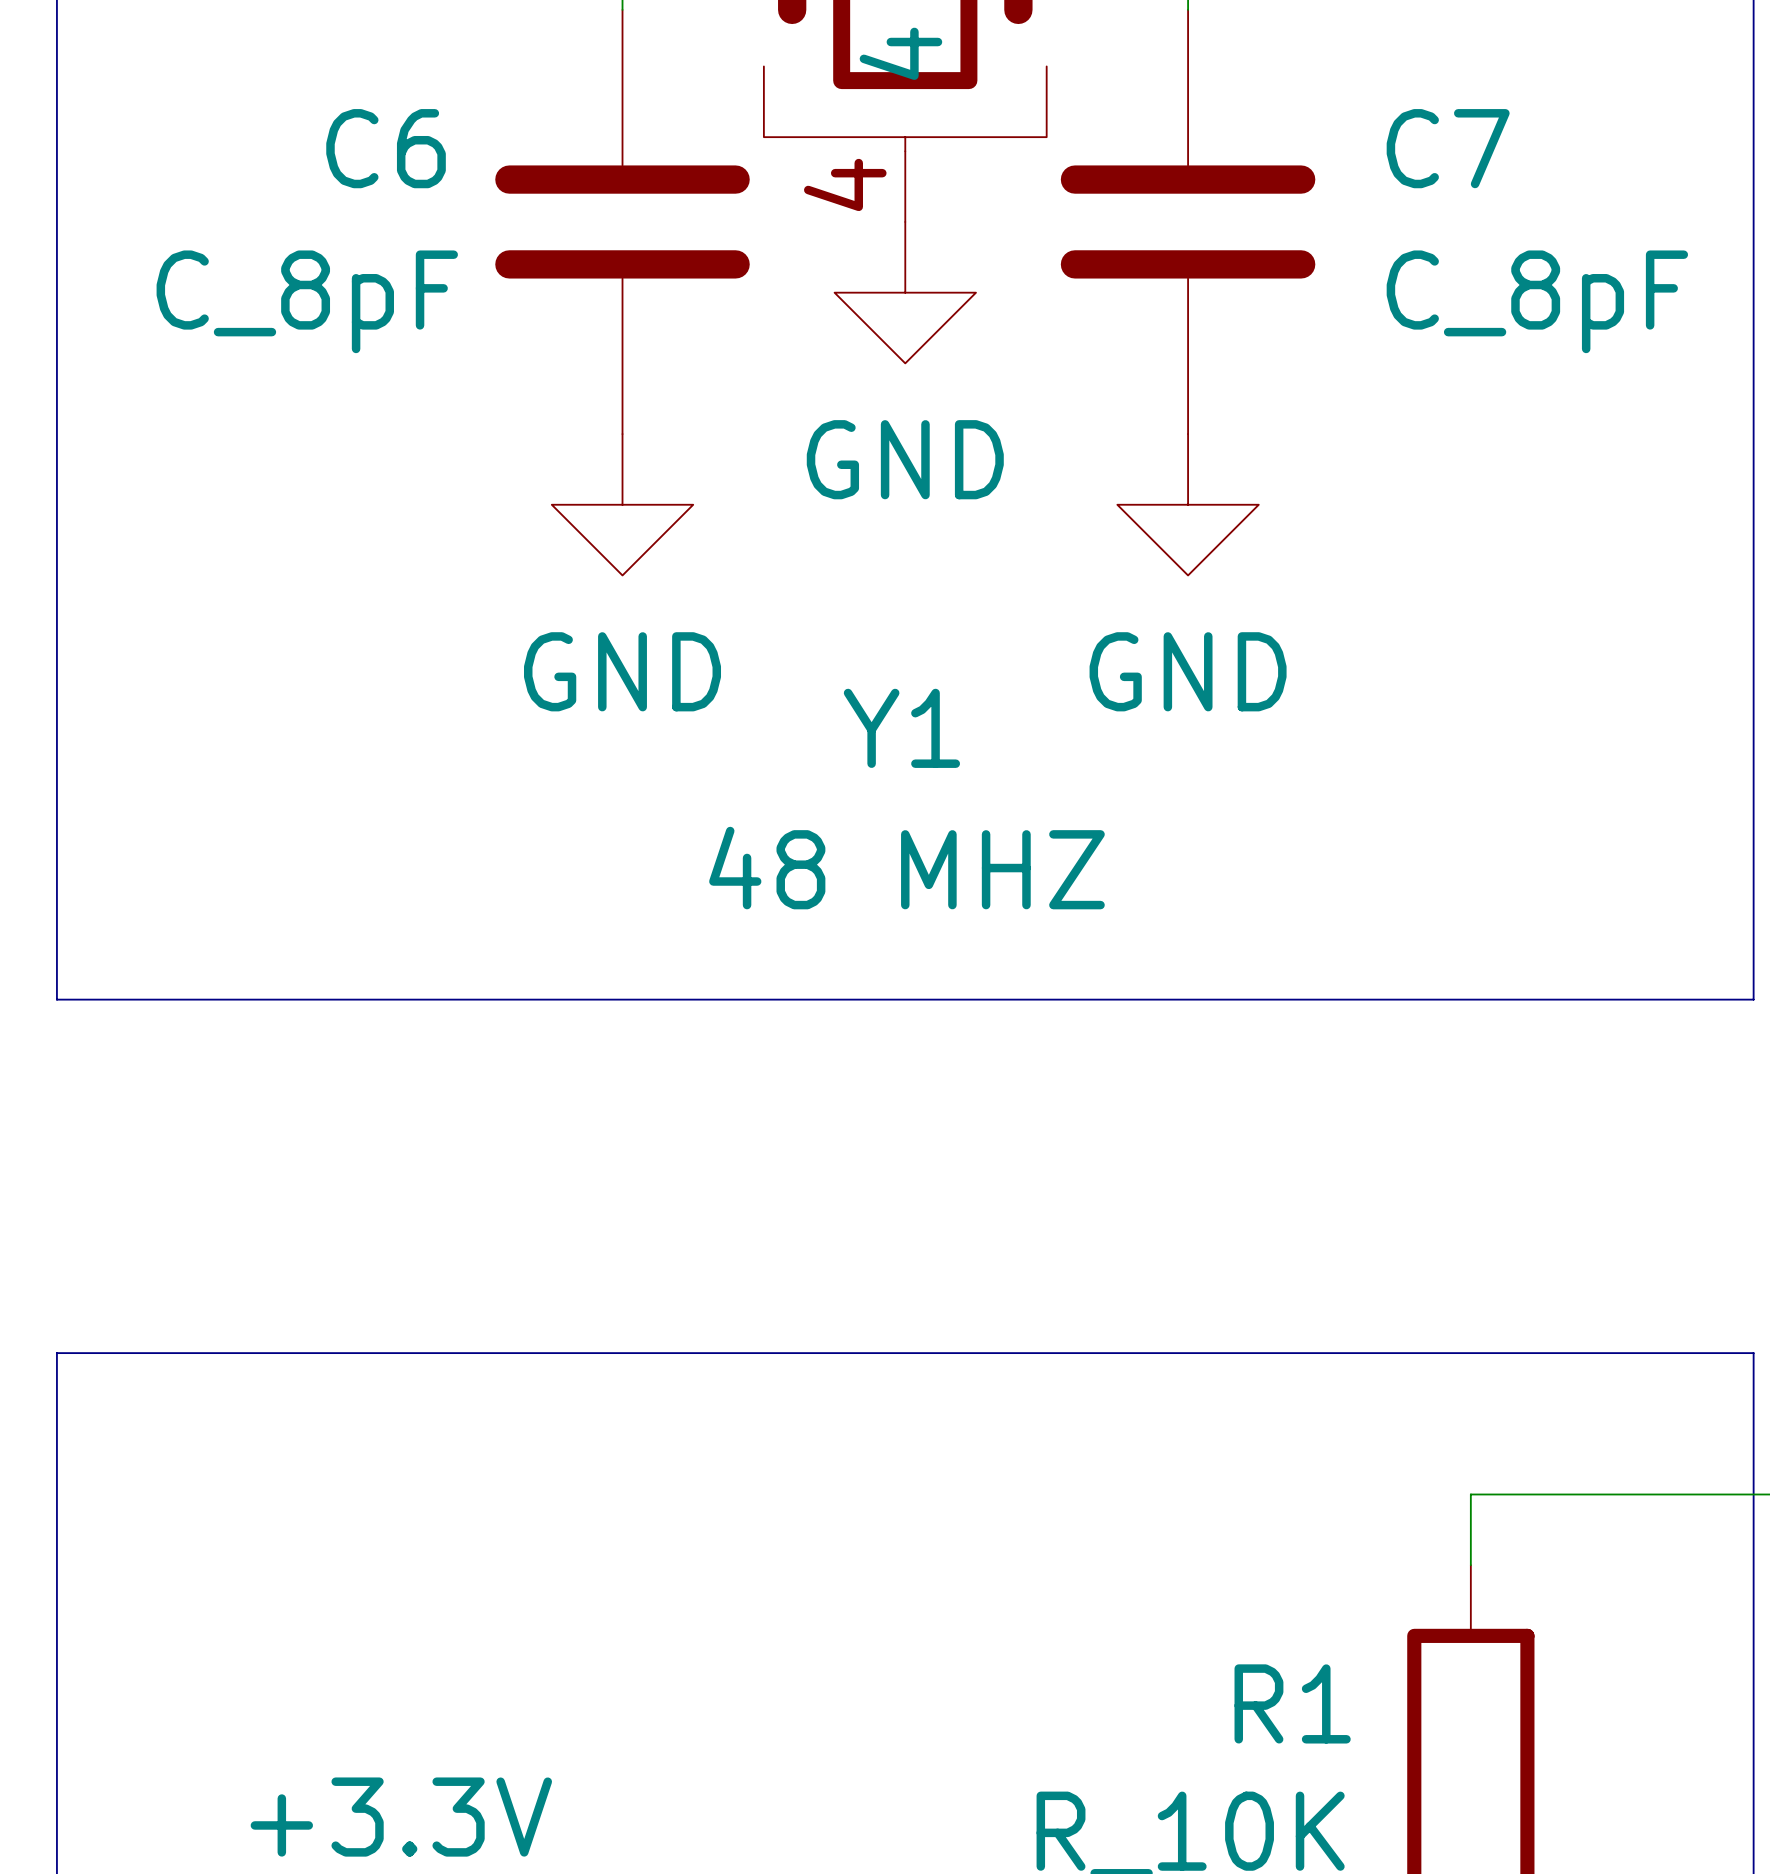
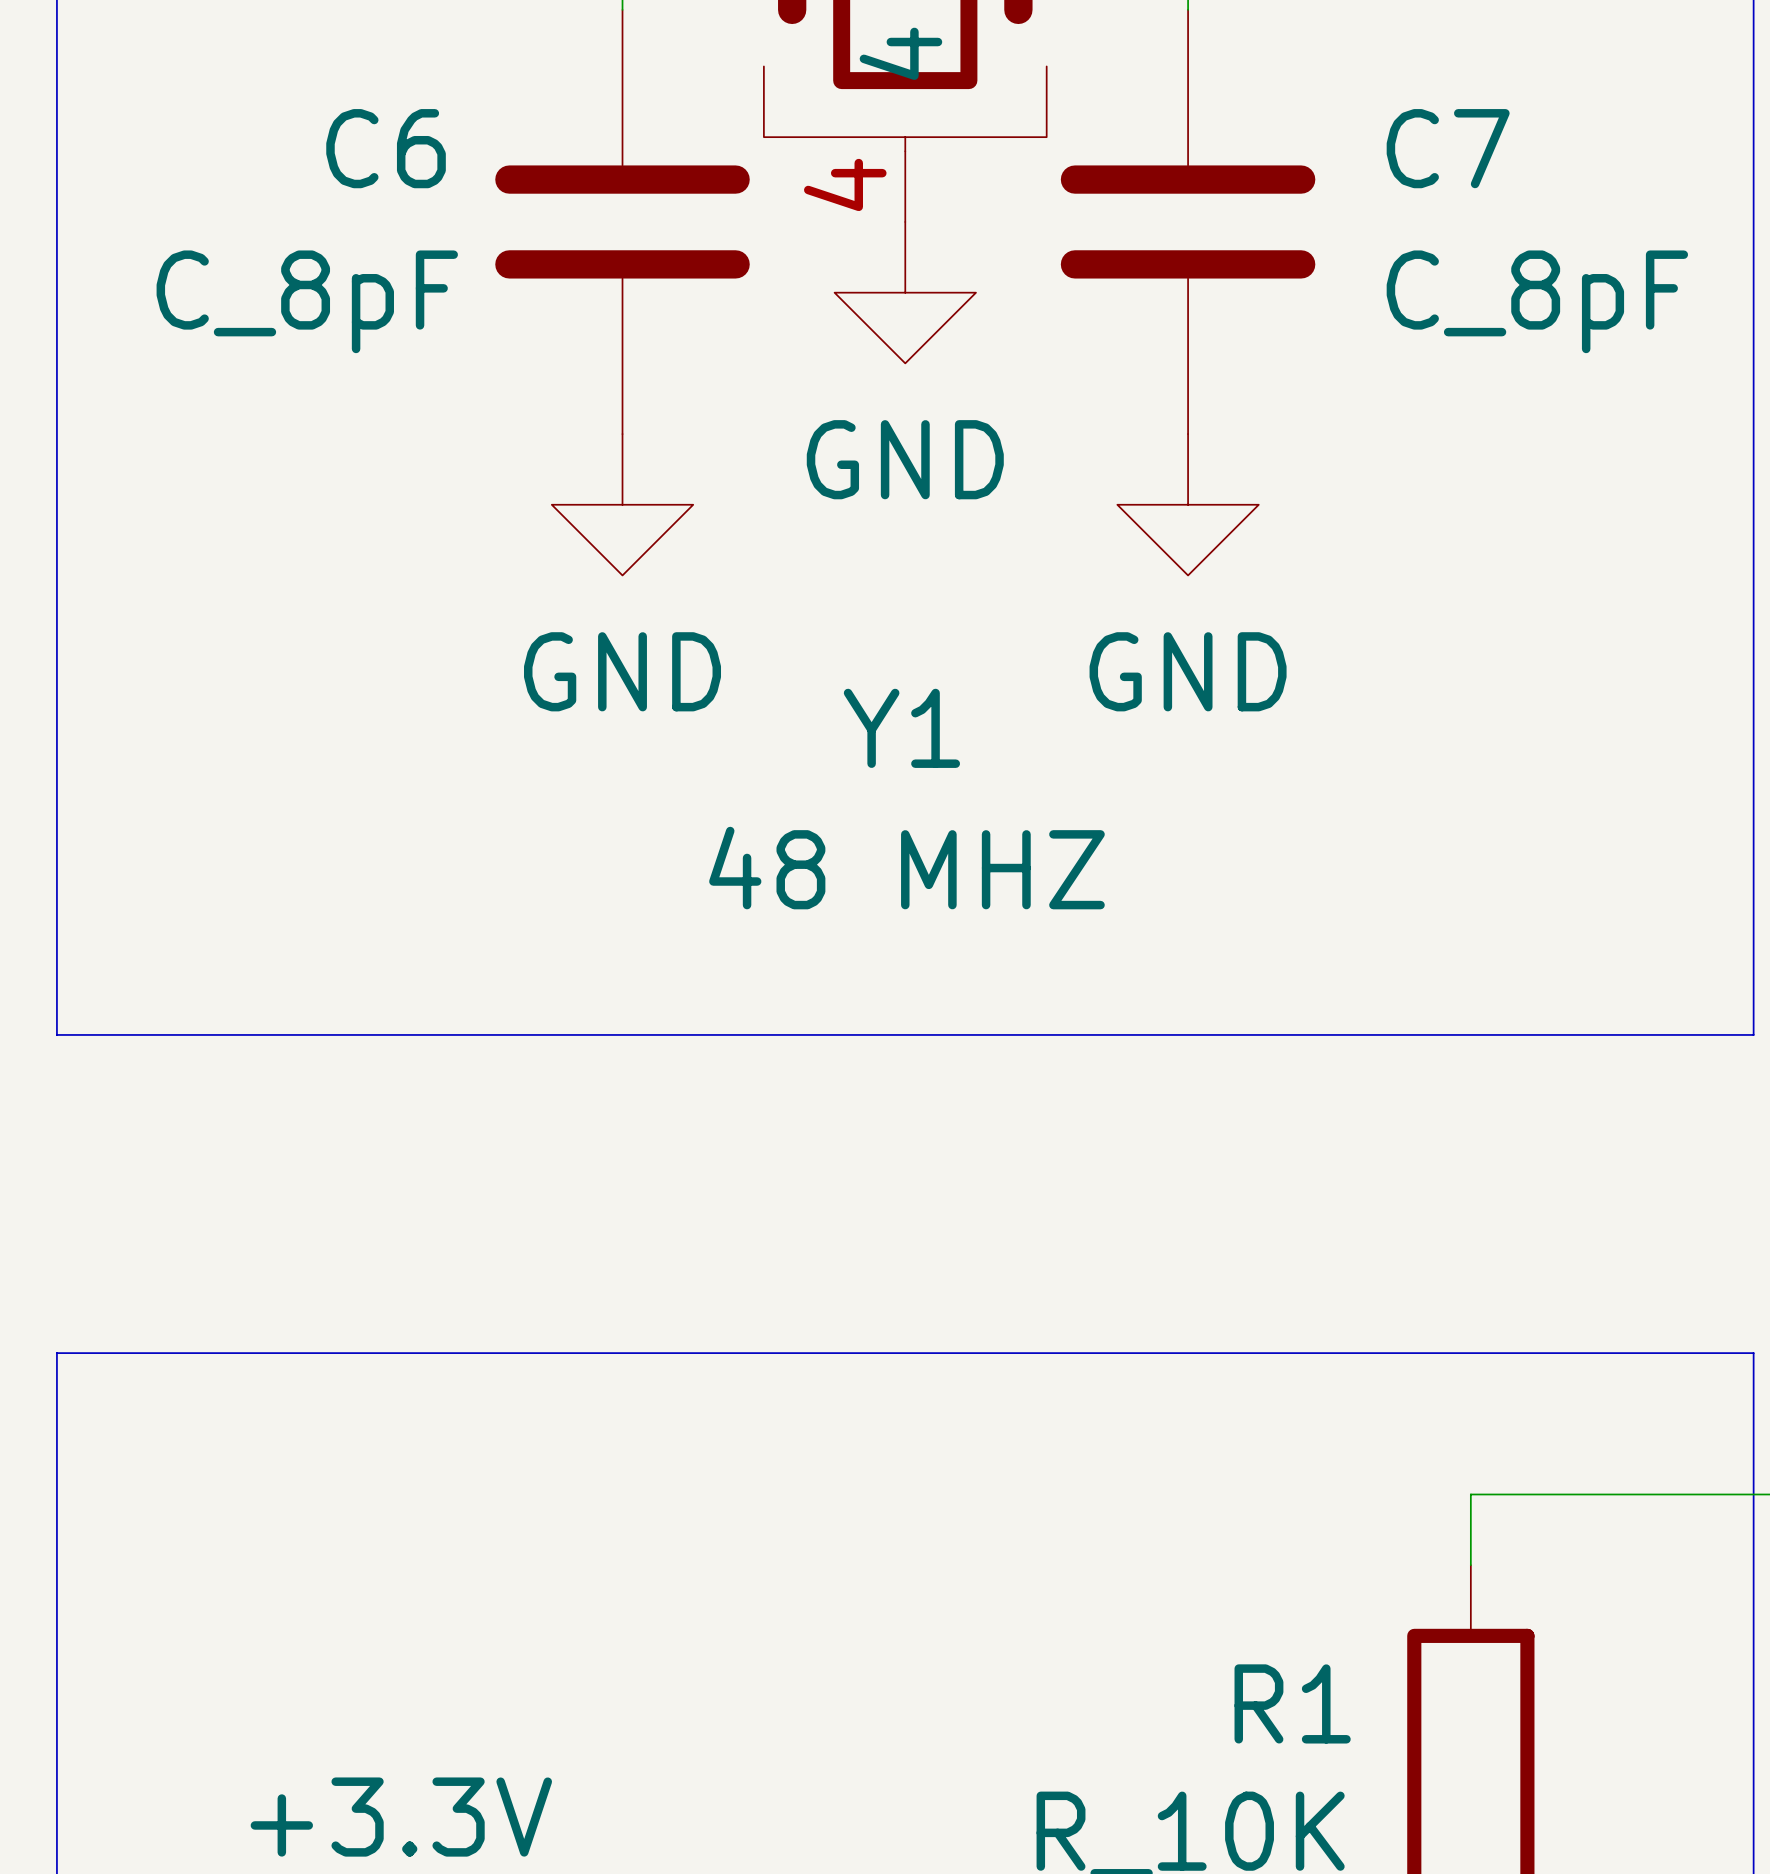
line: (56, 999) (1753, 999) -> (56, 999) (56, 1034) (1753, 1034) (1753, 999)

